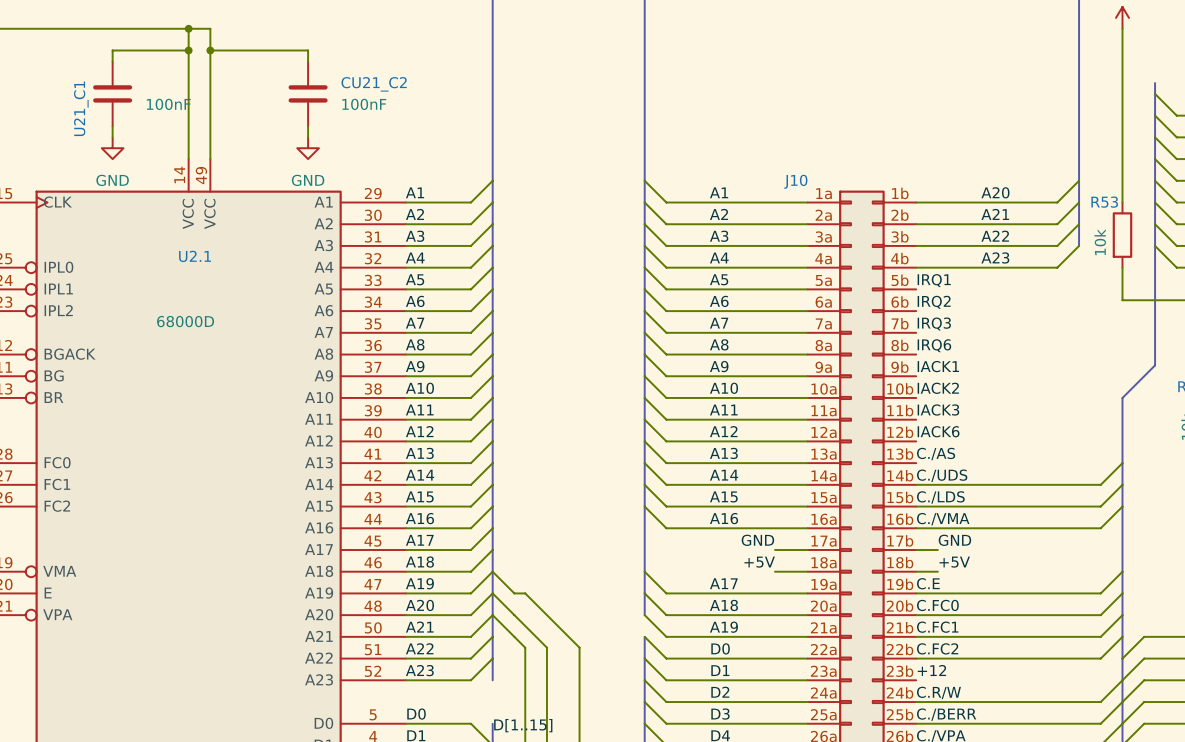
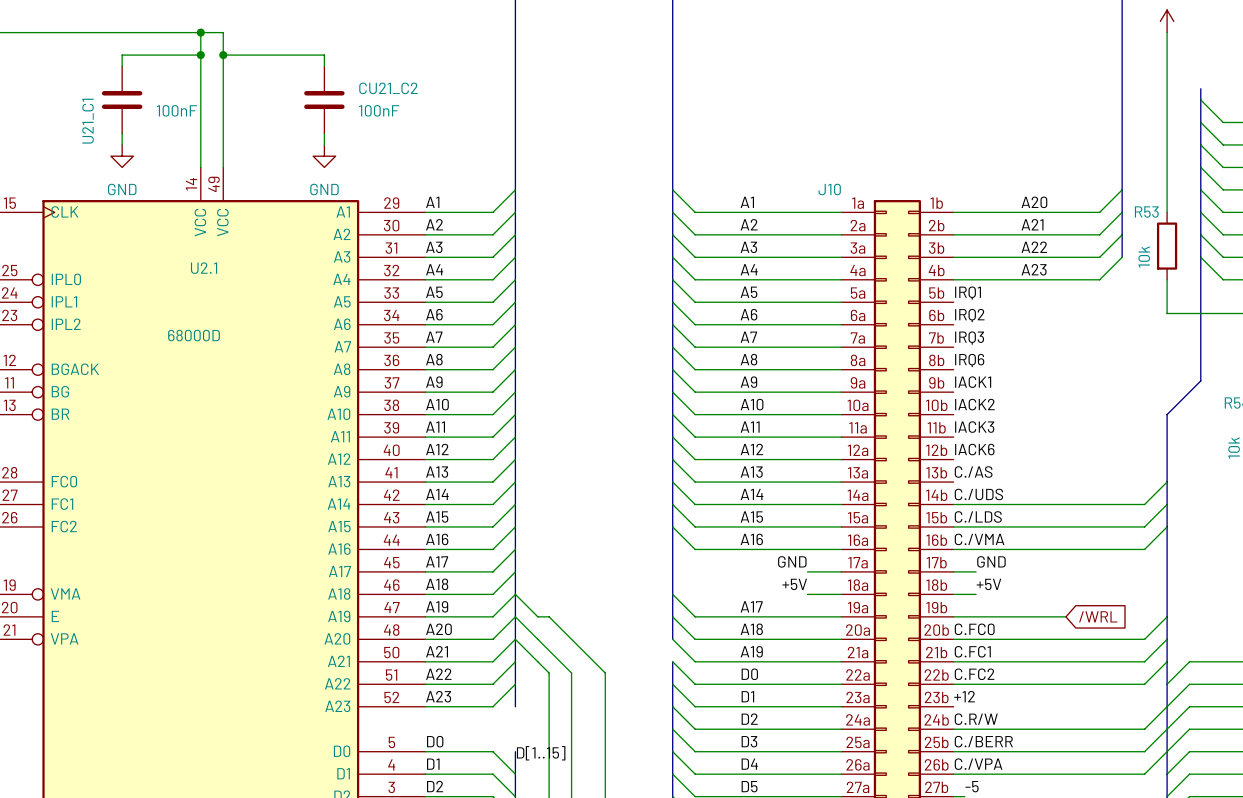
wire: (1122, 571) (1100, 593) (1024, 593) -> none
label: C.E (928, 583) -> none
global label: none -> /WRL (1098, 616)

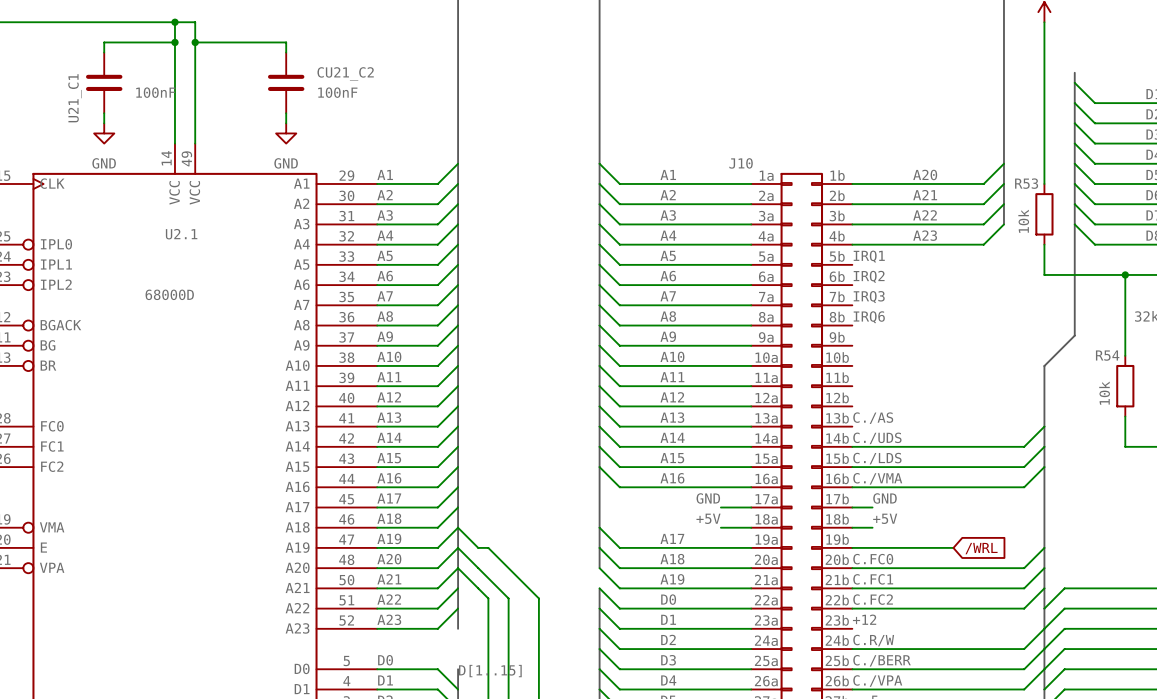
label: IACK1 (973, 382) -> none
label: IACK2 (974, 404) -> none
label: IACK3 (974, 427) -> none
label: IACK6 (974, 449) -> none

